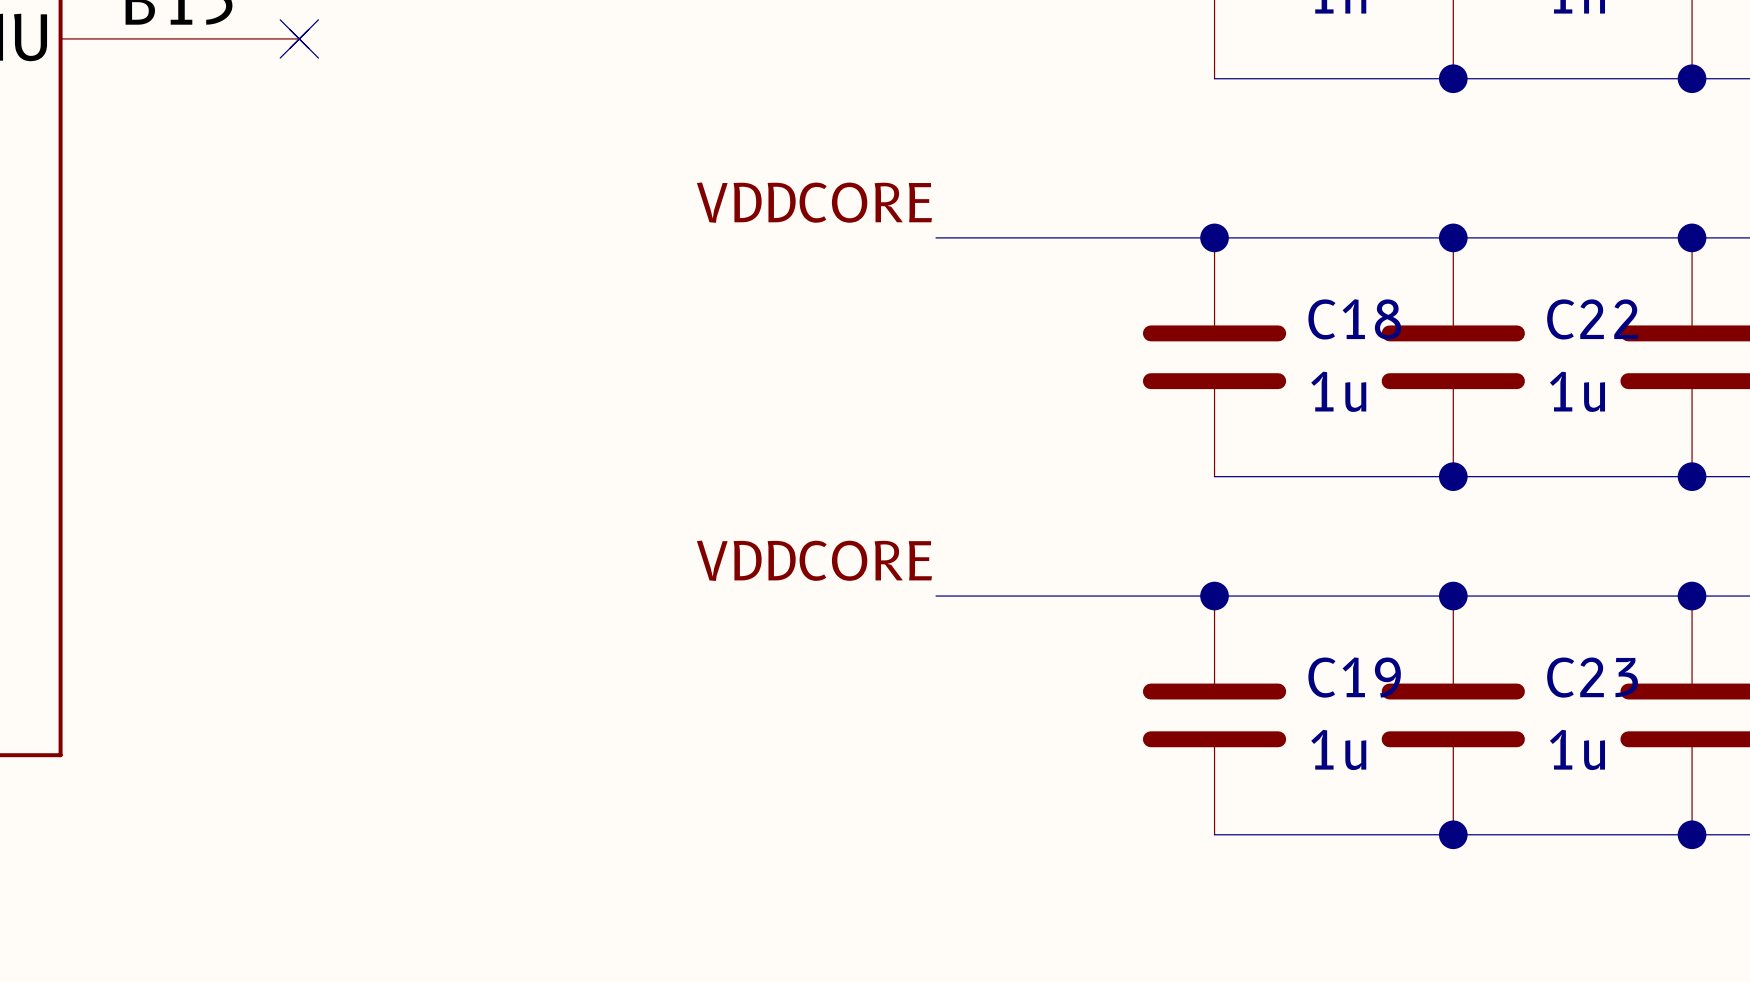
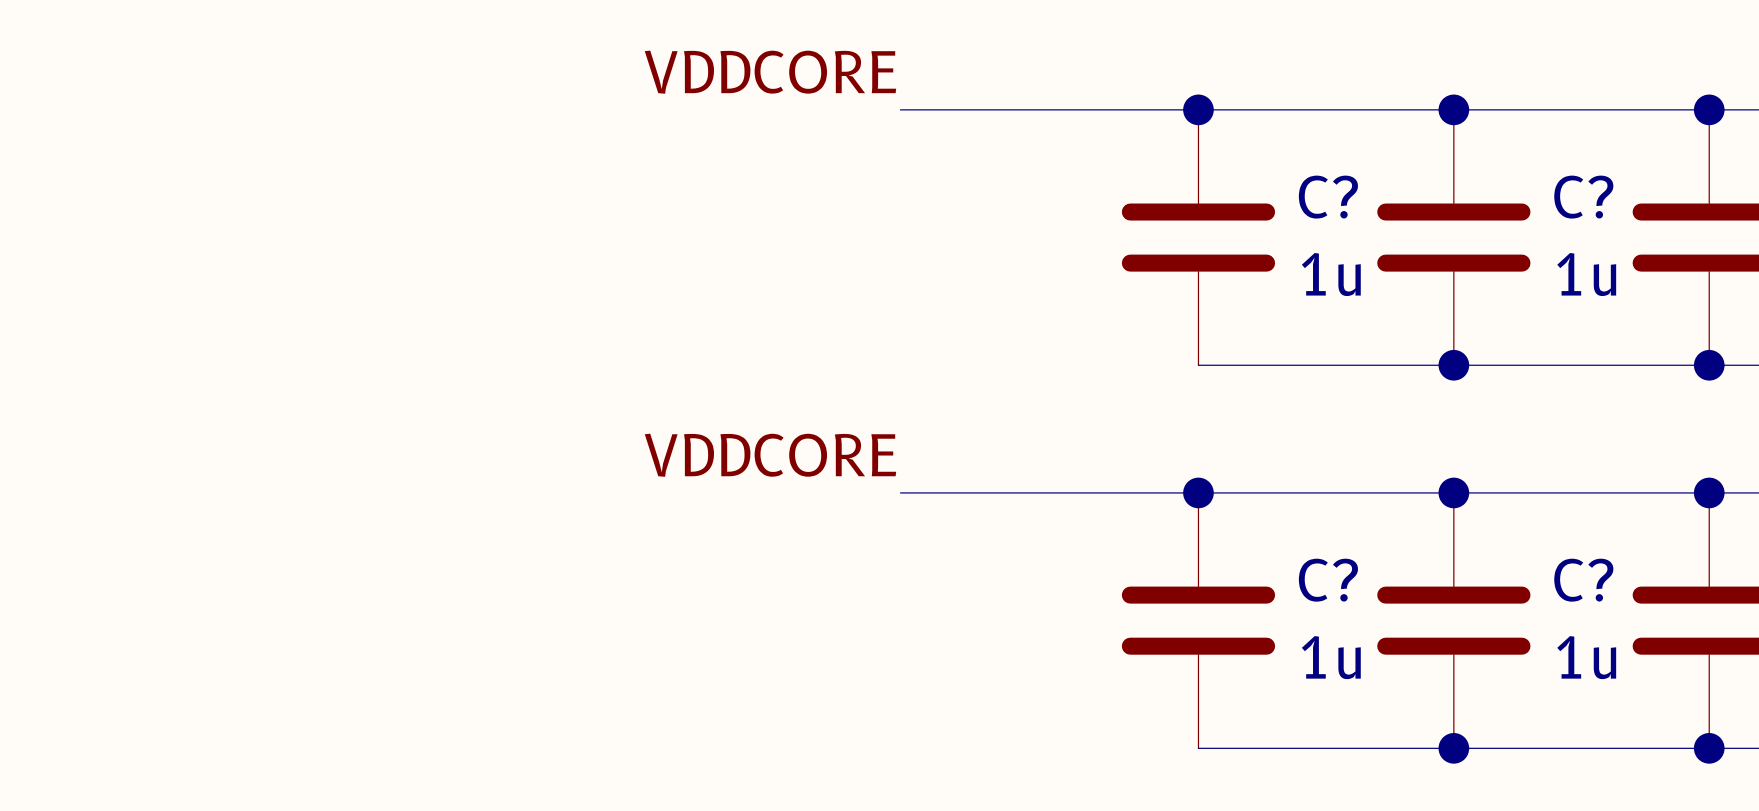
C18 name: C18 (1354, 319) -> C? (1328, 197)
C22 name: C22 (1592, 319) -> C? (1583, 197)
C19 name: C19 (1354, 677) -> C? (1328, 580)
C23 name: C23 (1592, 677) -> C? (1583, 580)

